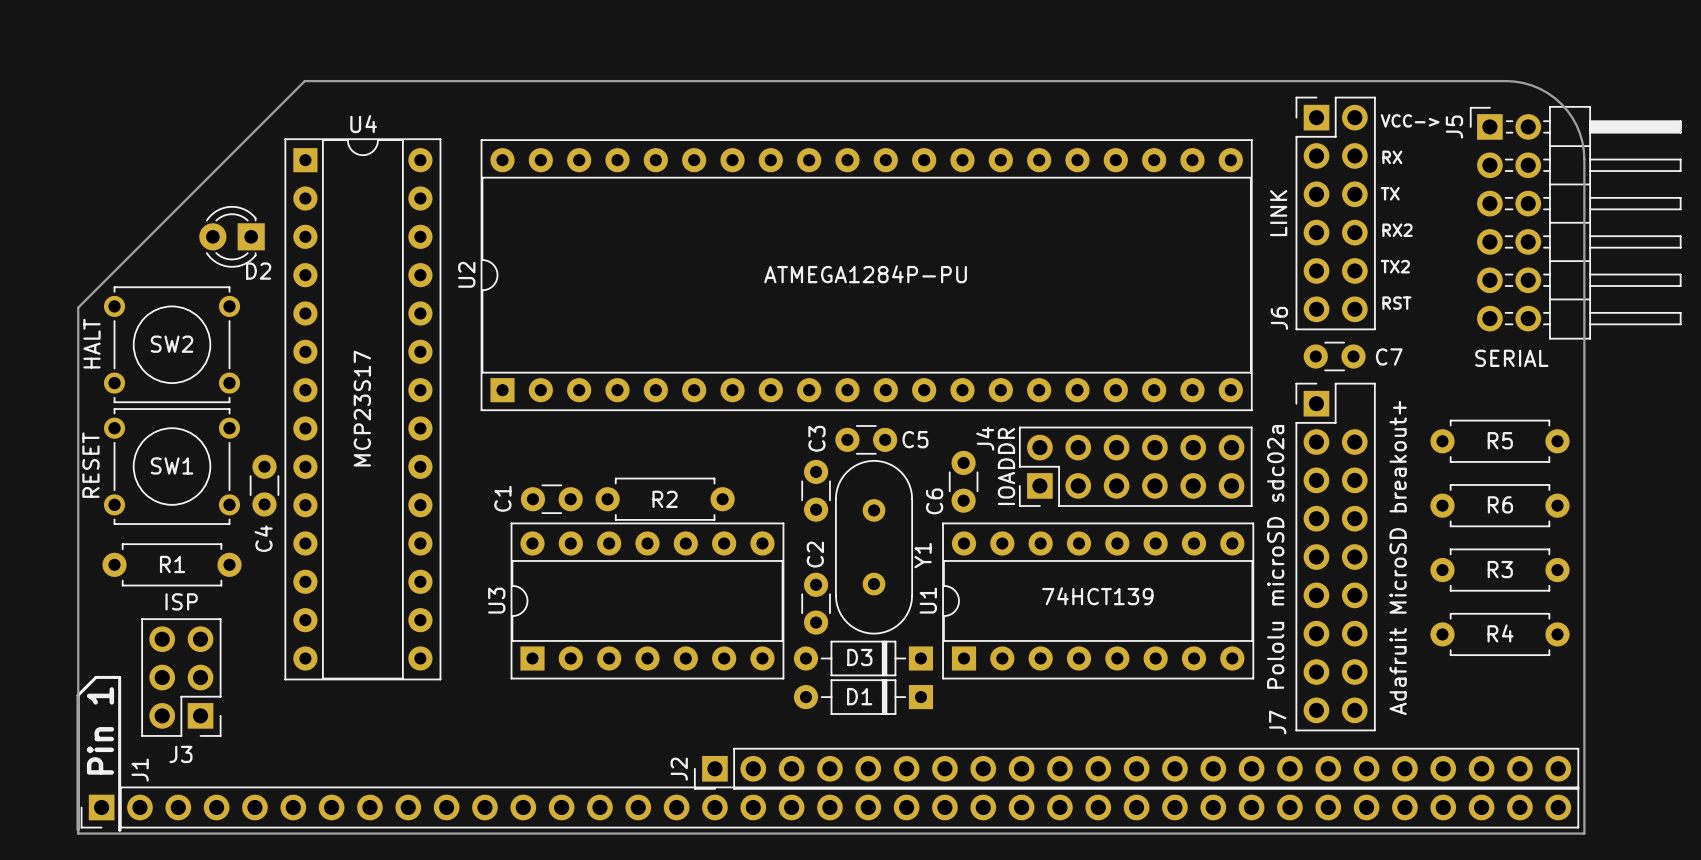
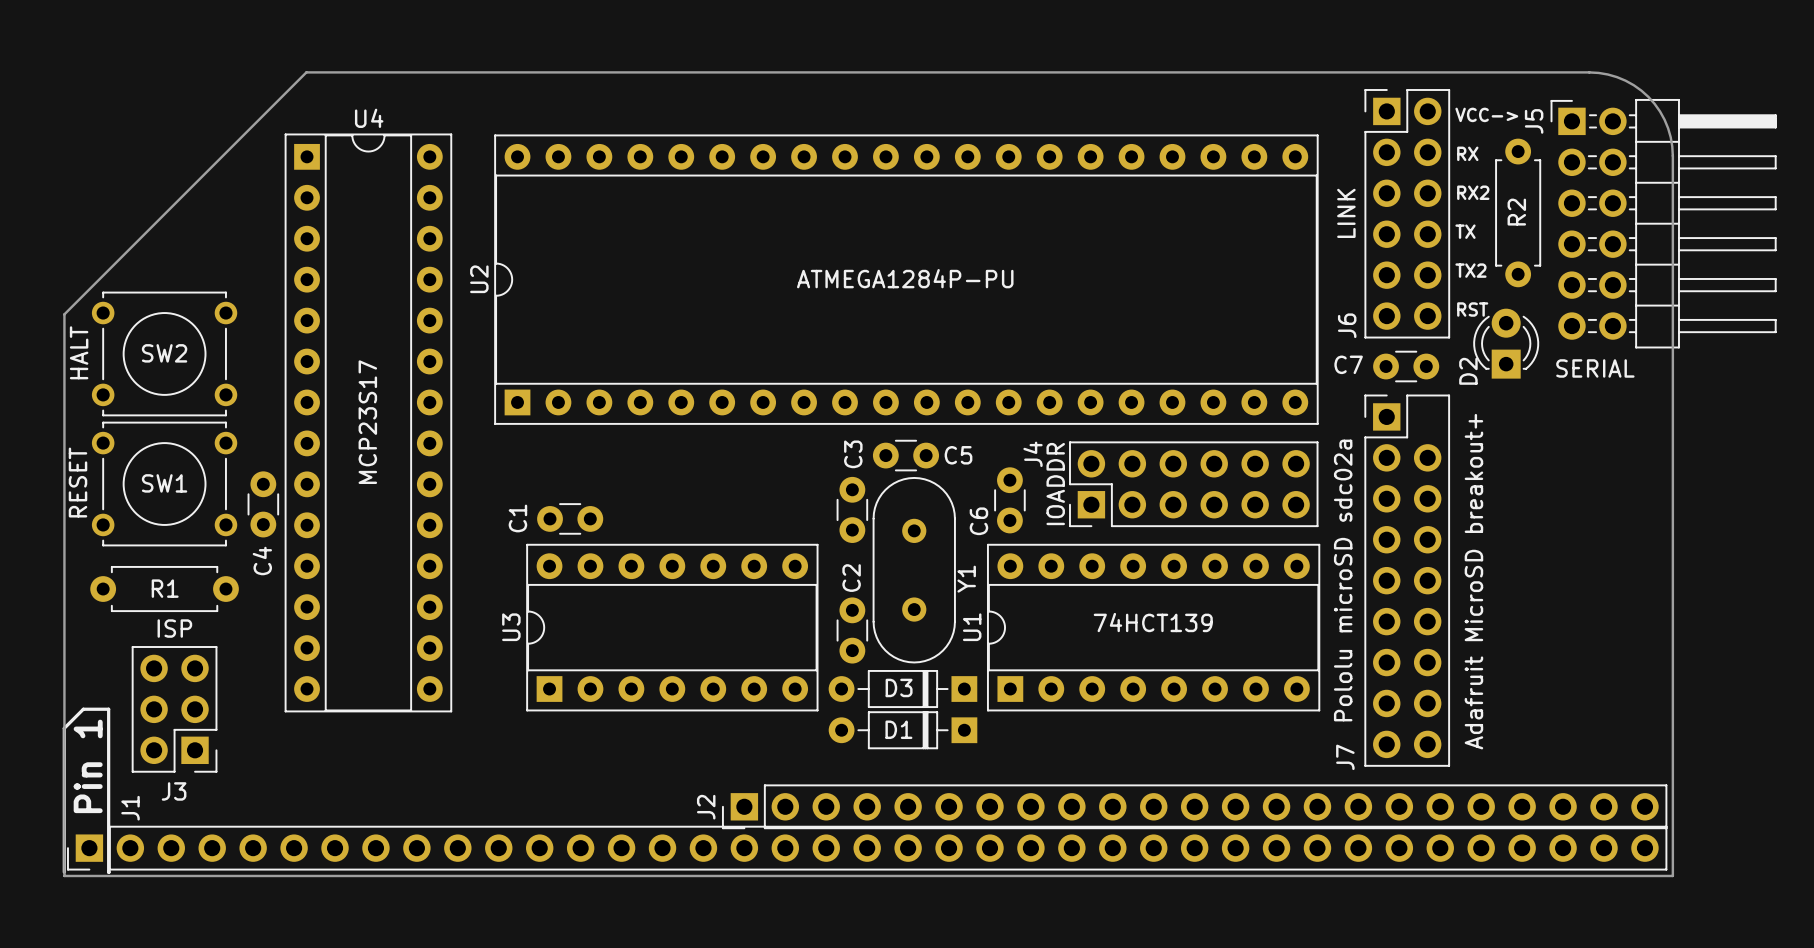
text: TX (1390, 193) -> RX2 (1473, 192)
text: RX2 (1397, 230) -> TX (1465, 231)
D2 rotation: 0° (232, 236) -> 90° clockwise (1506, 343)
D2 position: (232, 236) -> (1506, 343)
C7 name position: C7 (1389, 356) -> C7 (1348, 364)
R5: (1499, 441) -> none
R2 rotation: 0° (665, 499) -> 90° clockwise (1518, 212)
R2 position: (665, 499) -> (1518, 212)
R6: (1499, 505) -> none
R3: (1499, 570) -> none
R4: (1499, 634) -> none

